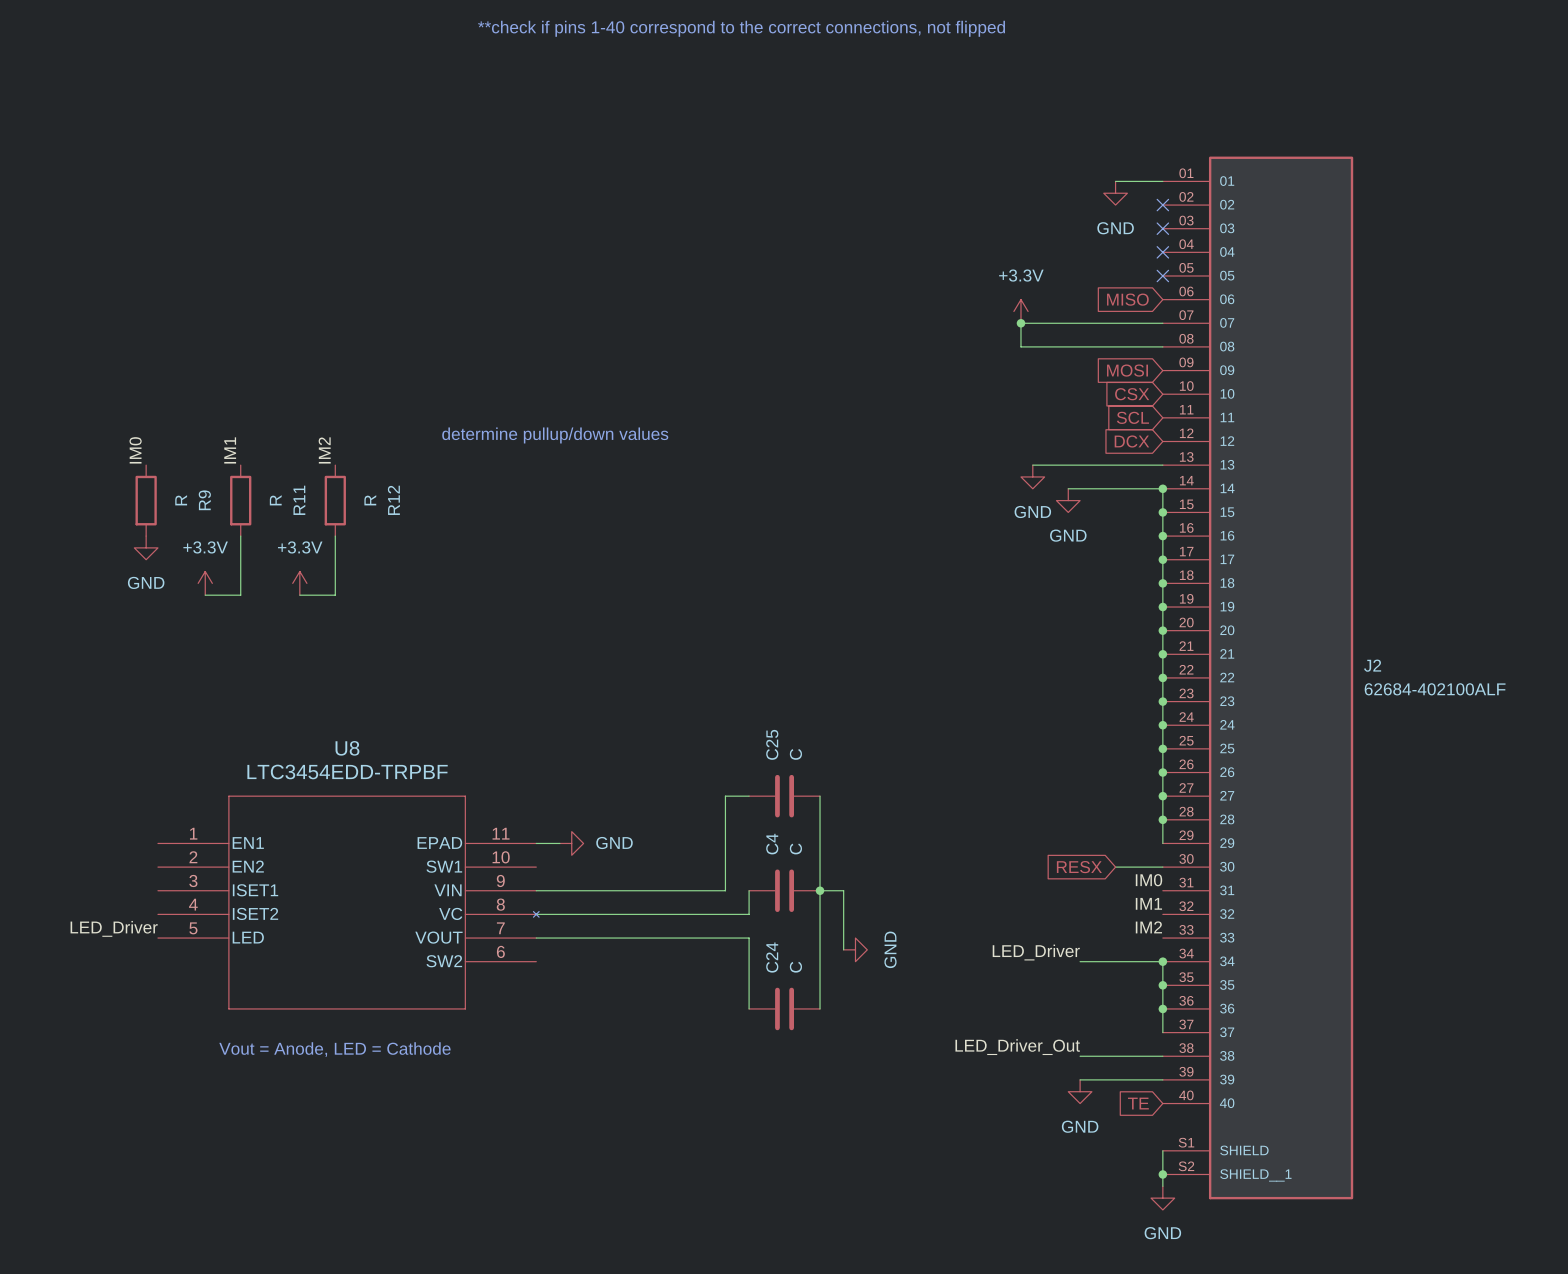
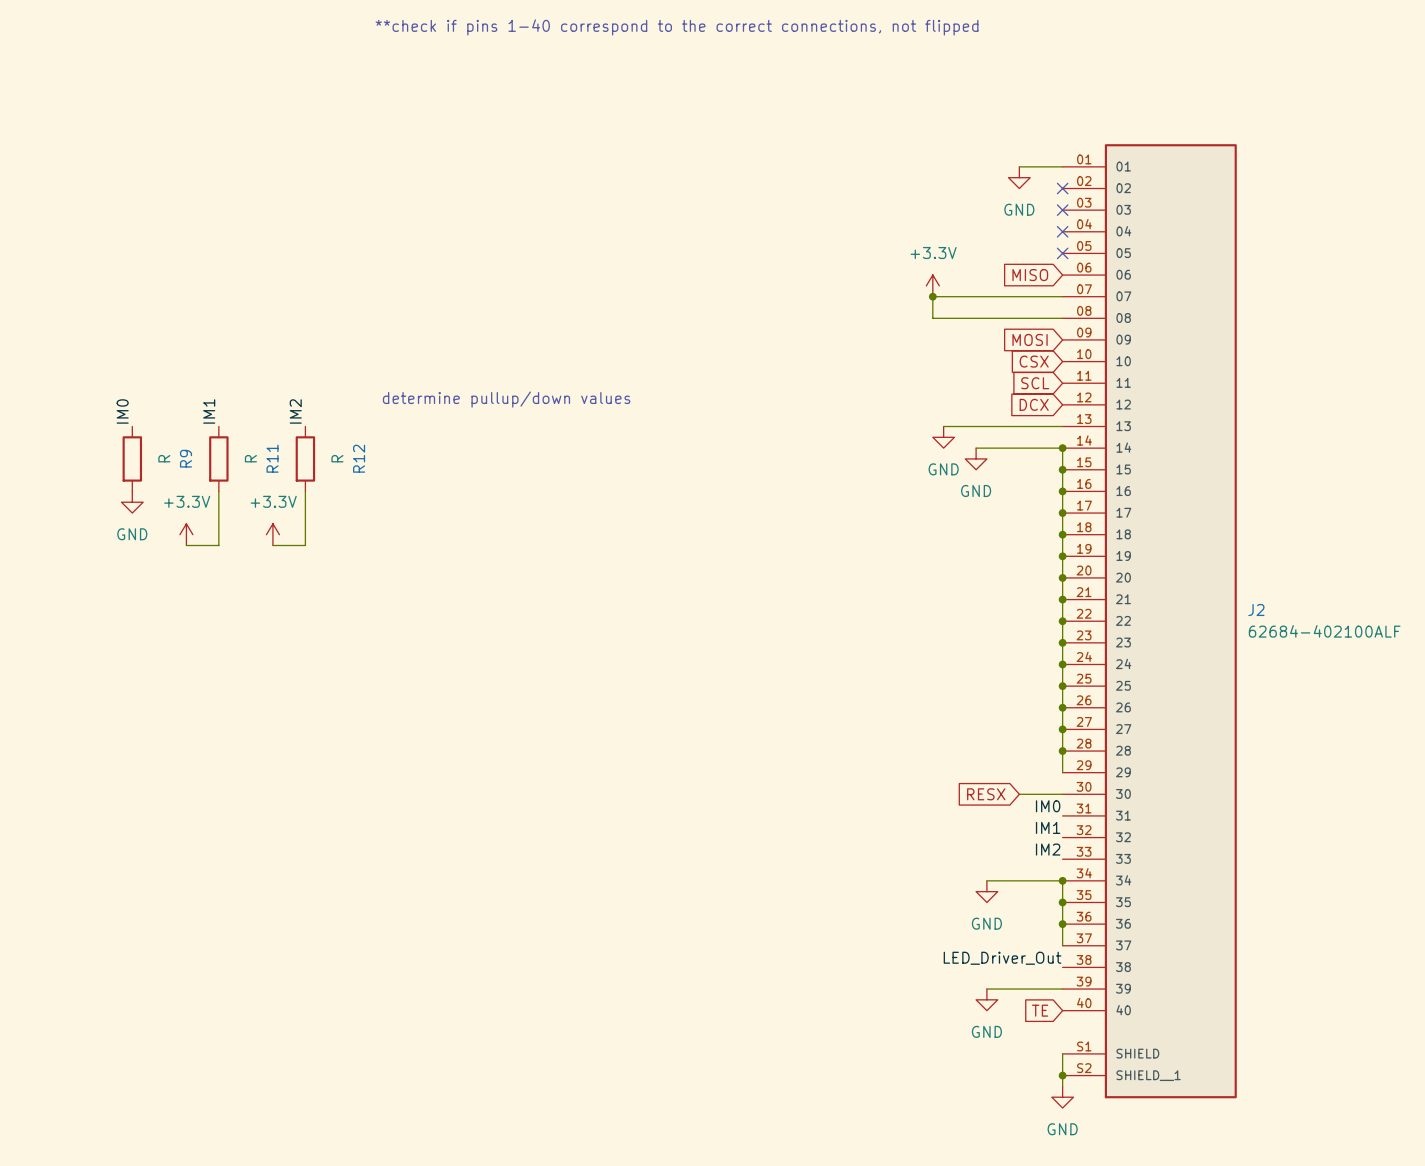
wire: (749, 796) (725, 796) (725, 890) (536, 890) -> none
C25: C (784, 796) -> none
wire: (820, 796) (820, 1008) -> none
wire: (536, 843) (559, 843) -> none
power symbol: GND (571, 843) -> none
wire: (749, 890) (749, 914) (536, 914) -> none
C4: C (784, 890) -> none
wire: (820, 890) (843, 890) (843, 949) -> none
junction: (820, 890) -> none
U8: LTC3454EDD-TRPBF (348, 902) -> none
label: LED_Driver (114, 928) -> none
wire: (536, 938) (749, 938) (749, 1008) -> none
power symbol rotation: 0° (855, 949) -> 90° clockwise (986, 891)
power symbol position: GND (855, 949) -> GND (986, 891)
label: LED_Driver (1036, 952) -> none
C24: C (784, 1008) -> none
label position: LED_Driver_Out (1017, 1047) -> LED_Driver_Out (1002, 958)
text: Vout = Anode, LED = Cathode (334, 1049) -> none
wire: (1080, 1056) (1162, 1056) -> none

